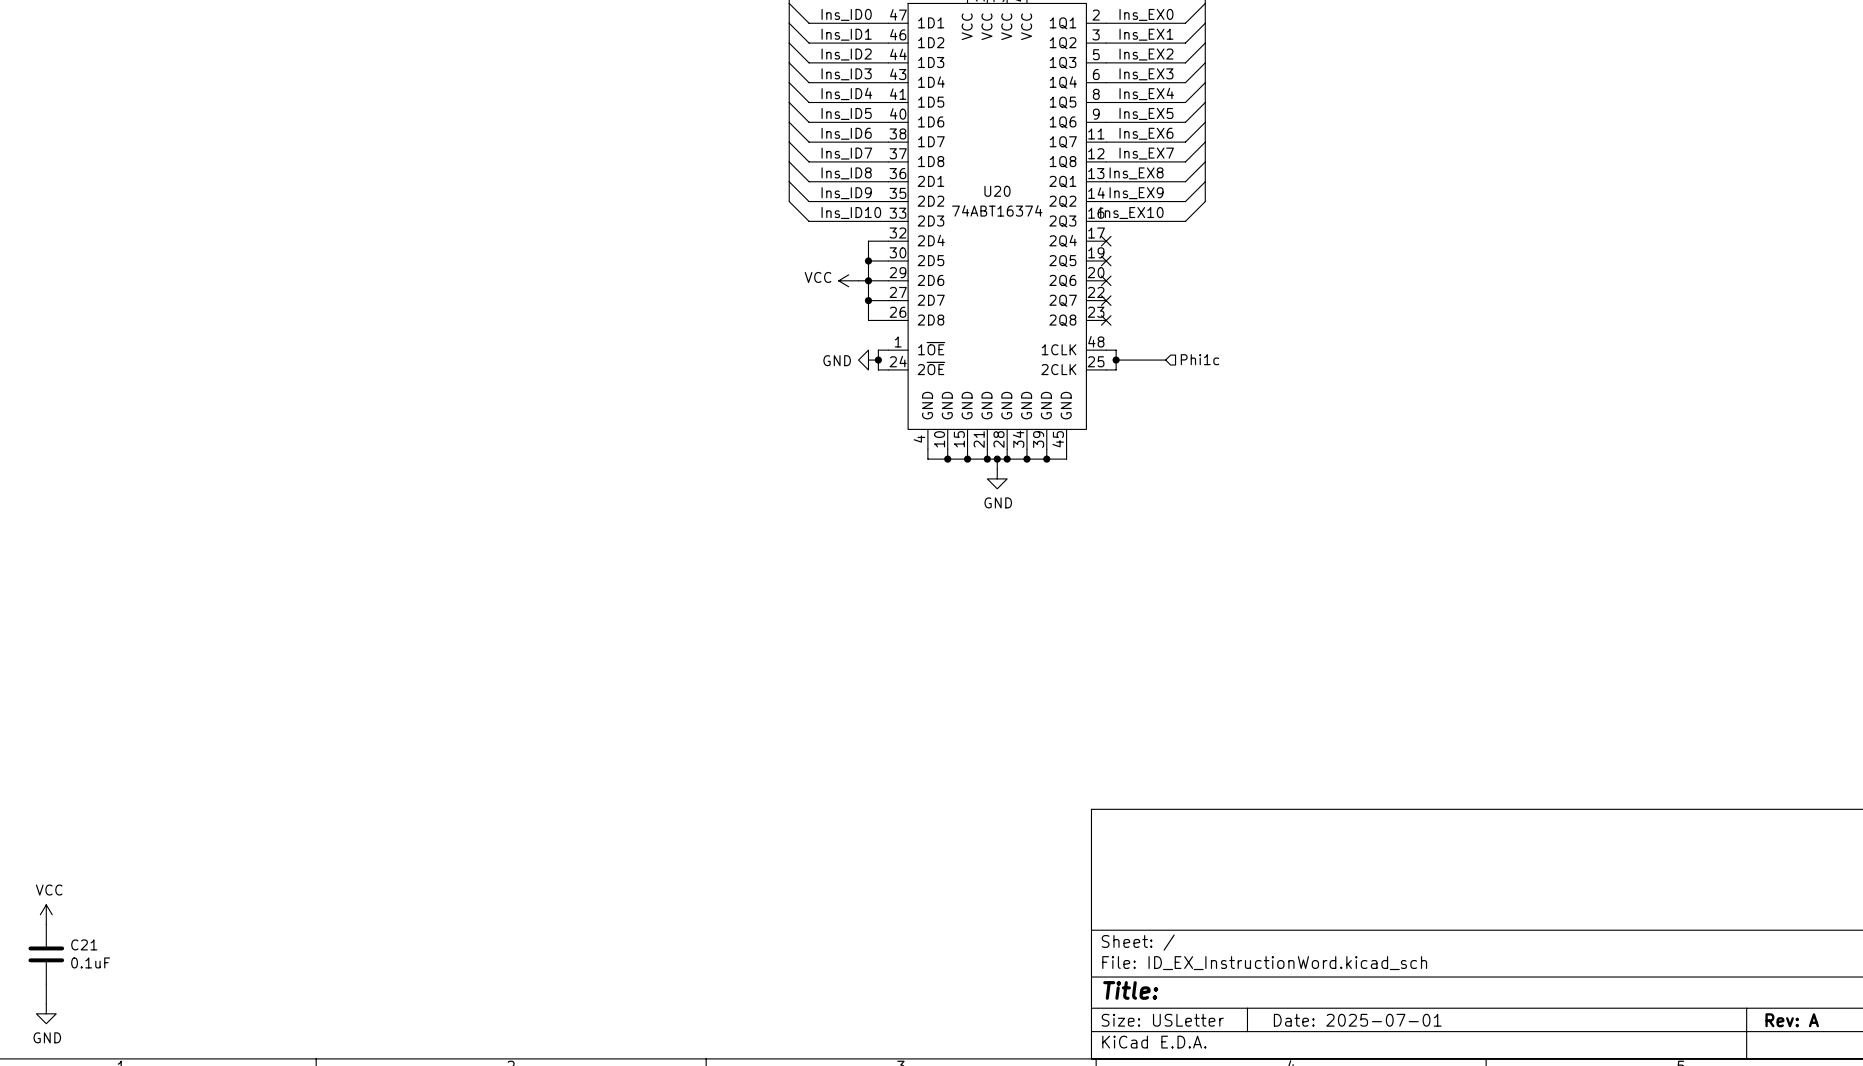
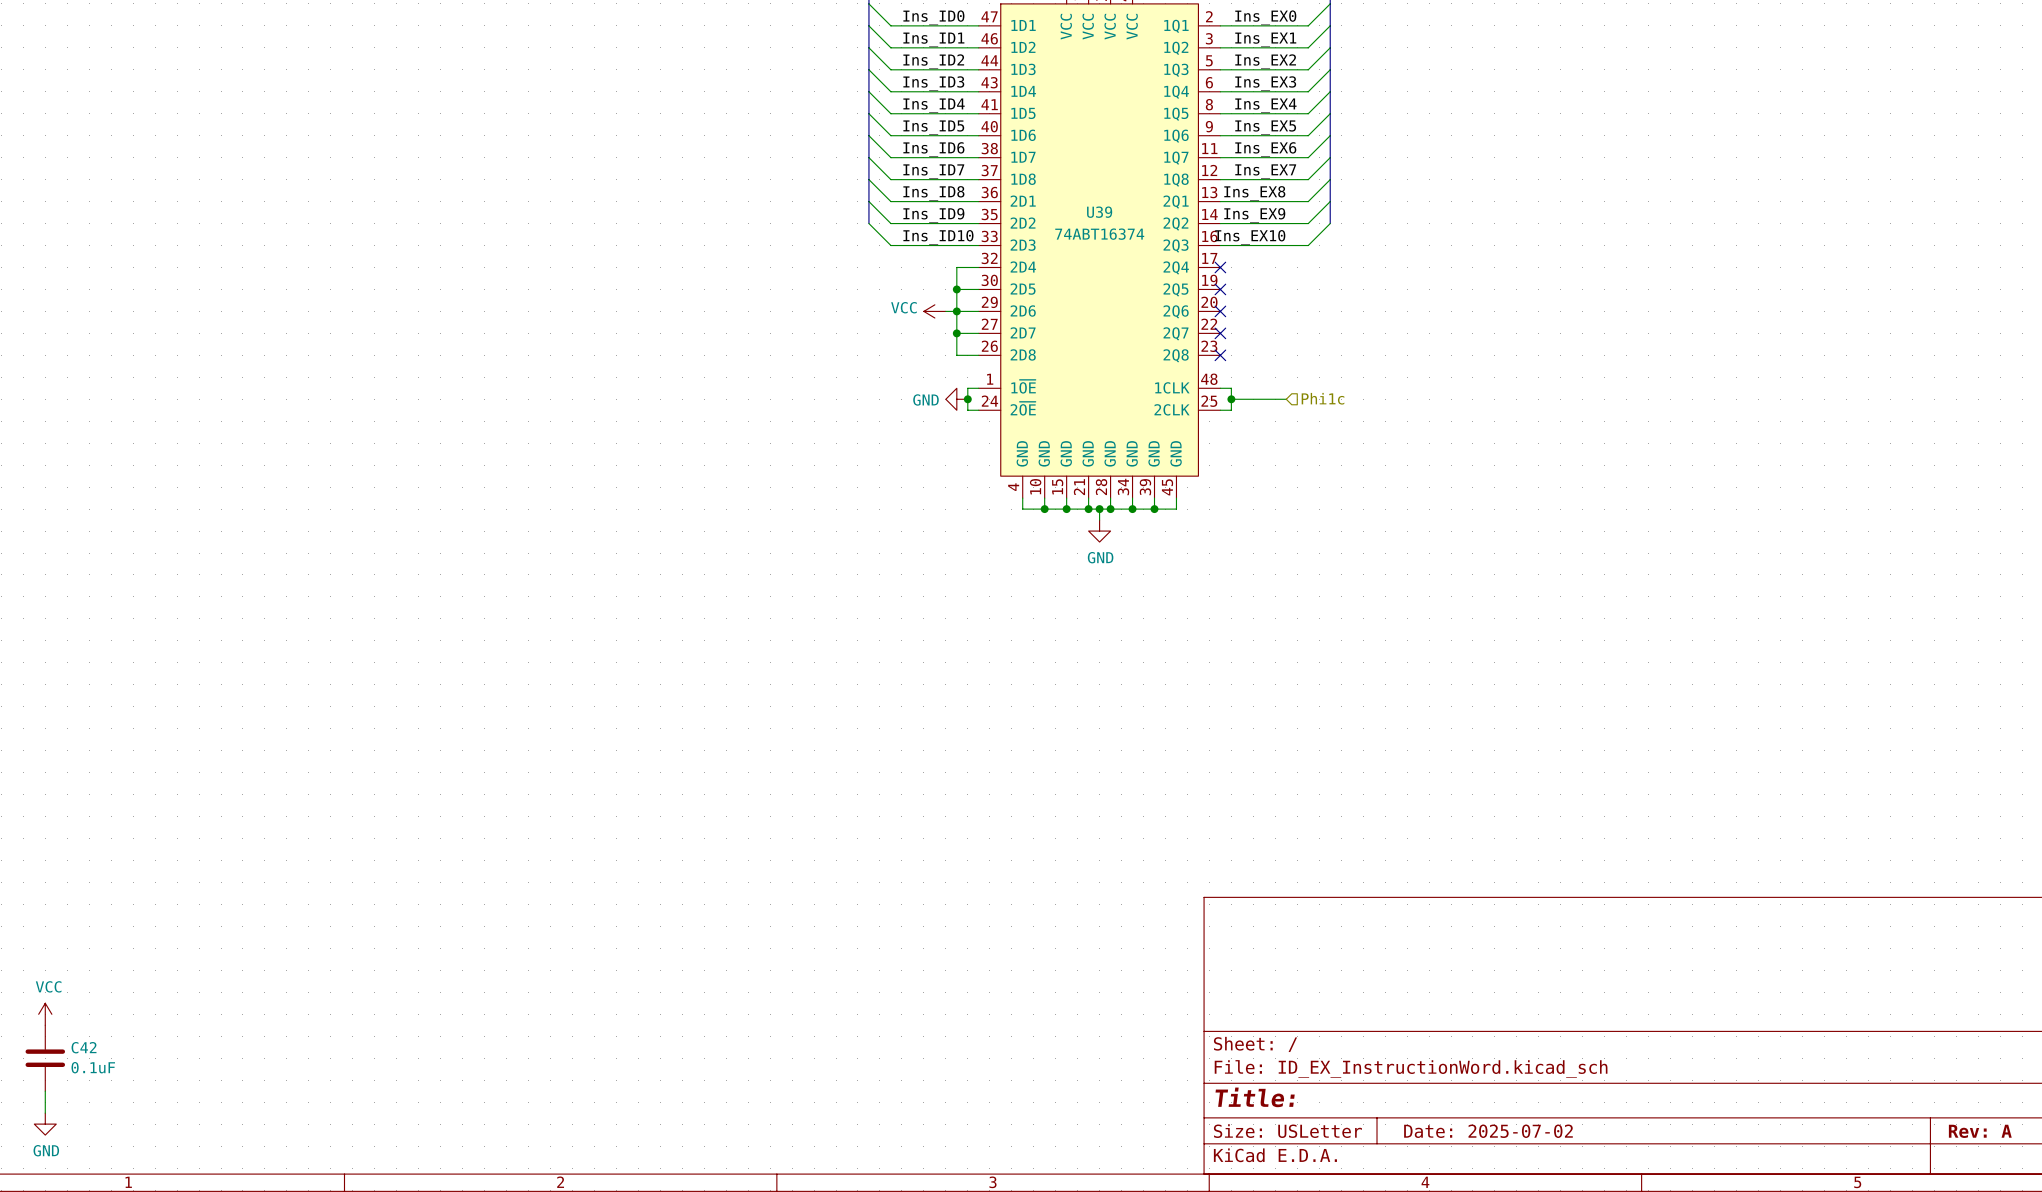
U20 name: U20 (997, 191) -> U39 (1099, 212)
C21 name: C21 (84, 944) -> C42 (84, 1047)
title block: Date: 2025-07-01 (1357, 1020) -> Date: 2025-07-02 (1488, 1131)

